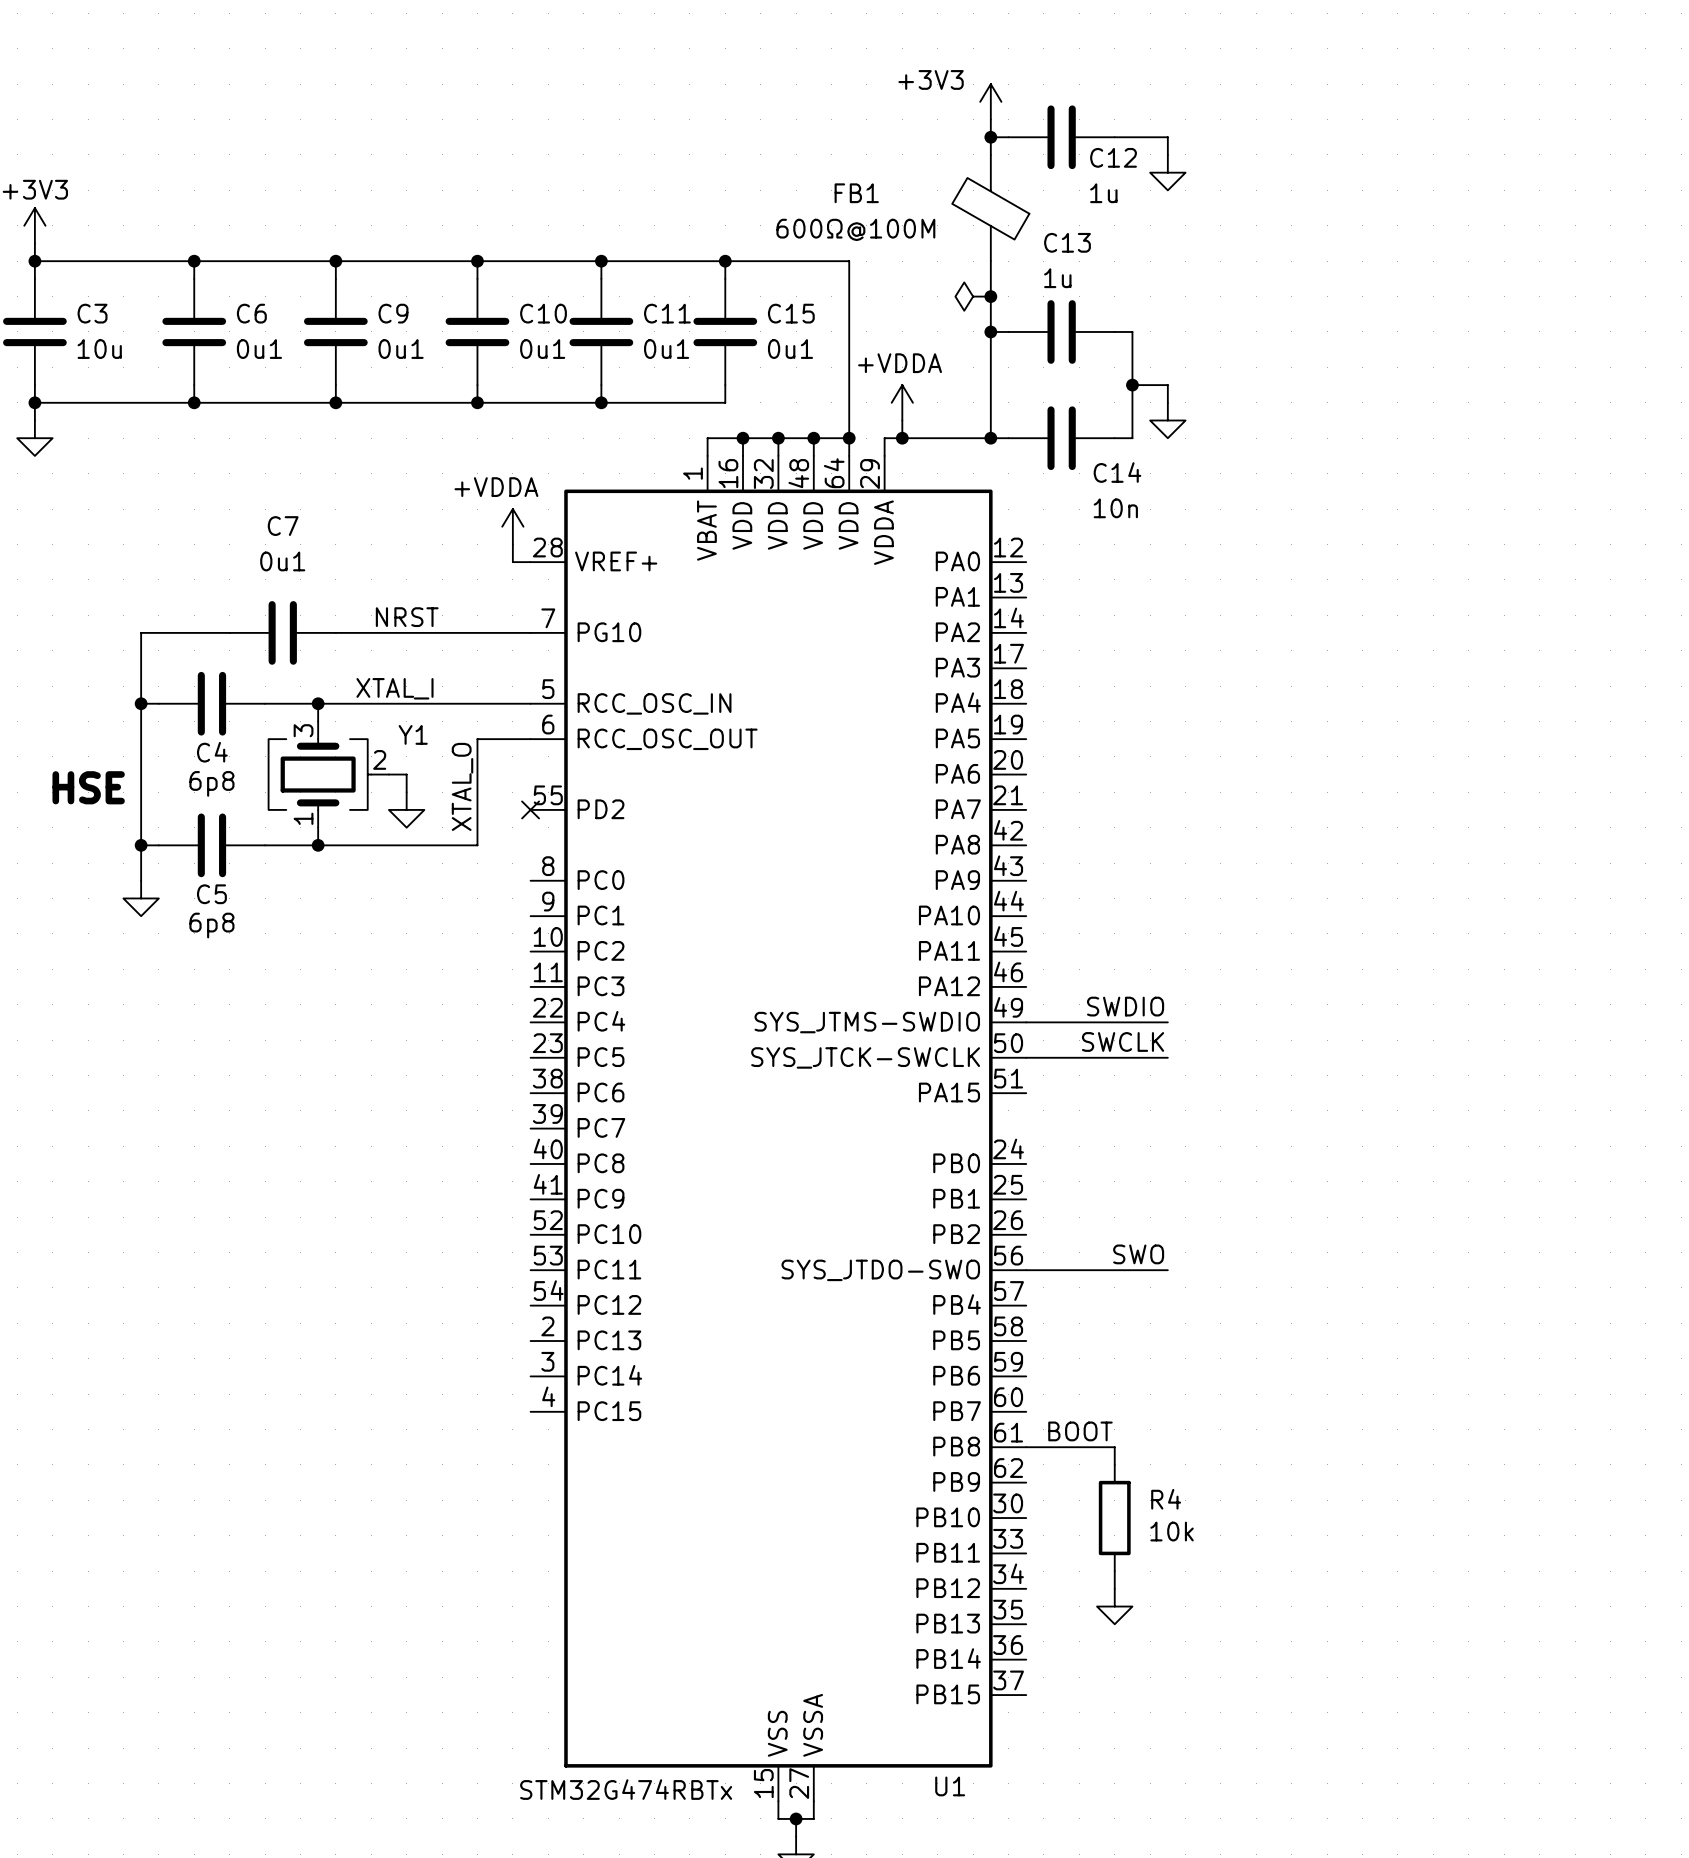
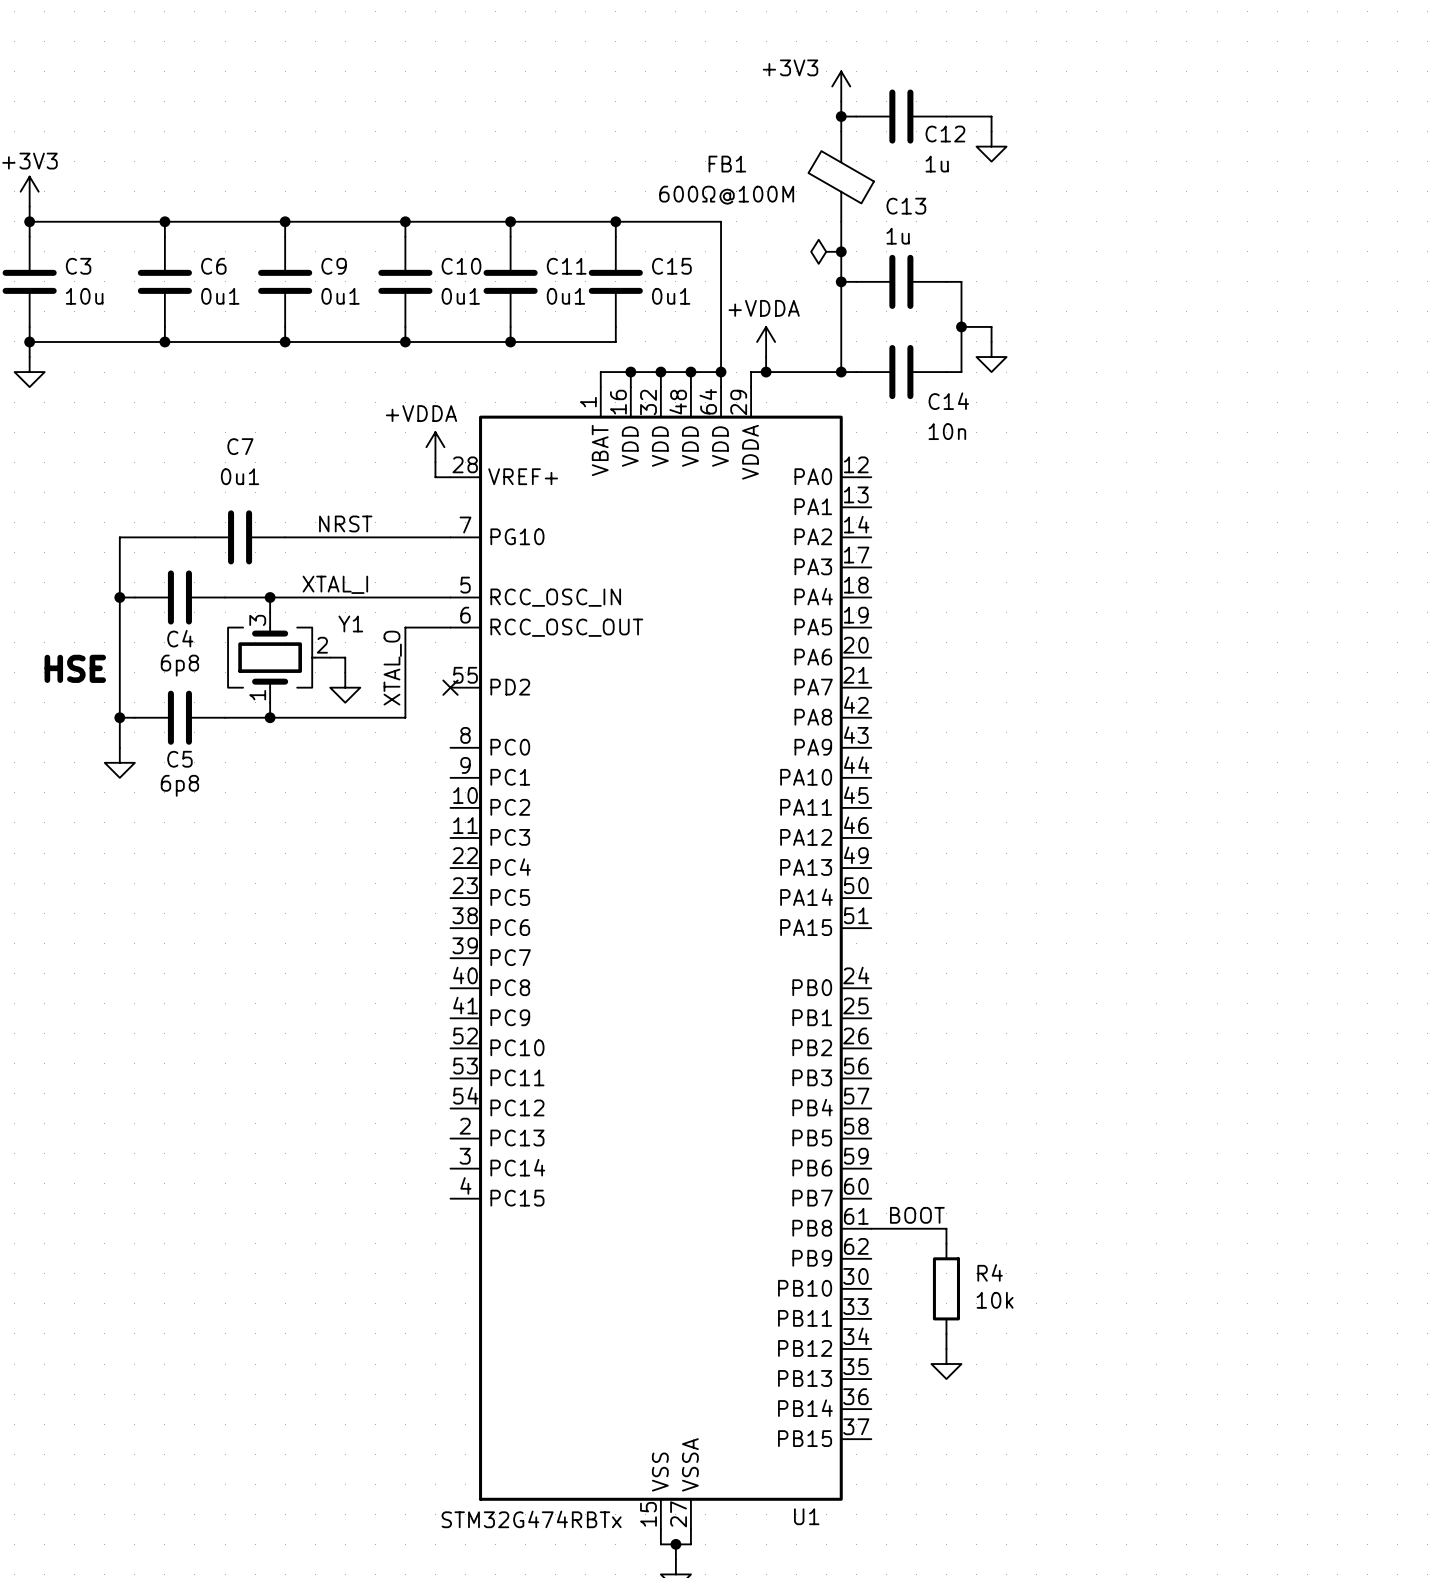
label: SWDIO (1125, 1006) -> none
U1 pin name: SYS_JTMS-SWDIO (867, 1022) -> PA13 (806, 867)
wire: (1026, 1022) (1167, 1022) -> none
label: SWCLK (1123, 1041) -> none
U1 pin name: SYS_JTCK-SWCLK (865, 1057) -> PA14 (806, 897)
wire: (1026, 1057) (1167, 1057) -> none
label: SWO (1138, 1254) -> none
U1 pin name: SYS_JTDO-SWO (880, 1270) -> PB3 (812, 1077)
wire: (1026, 1270) (1167, 1270) -> none

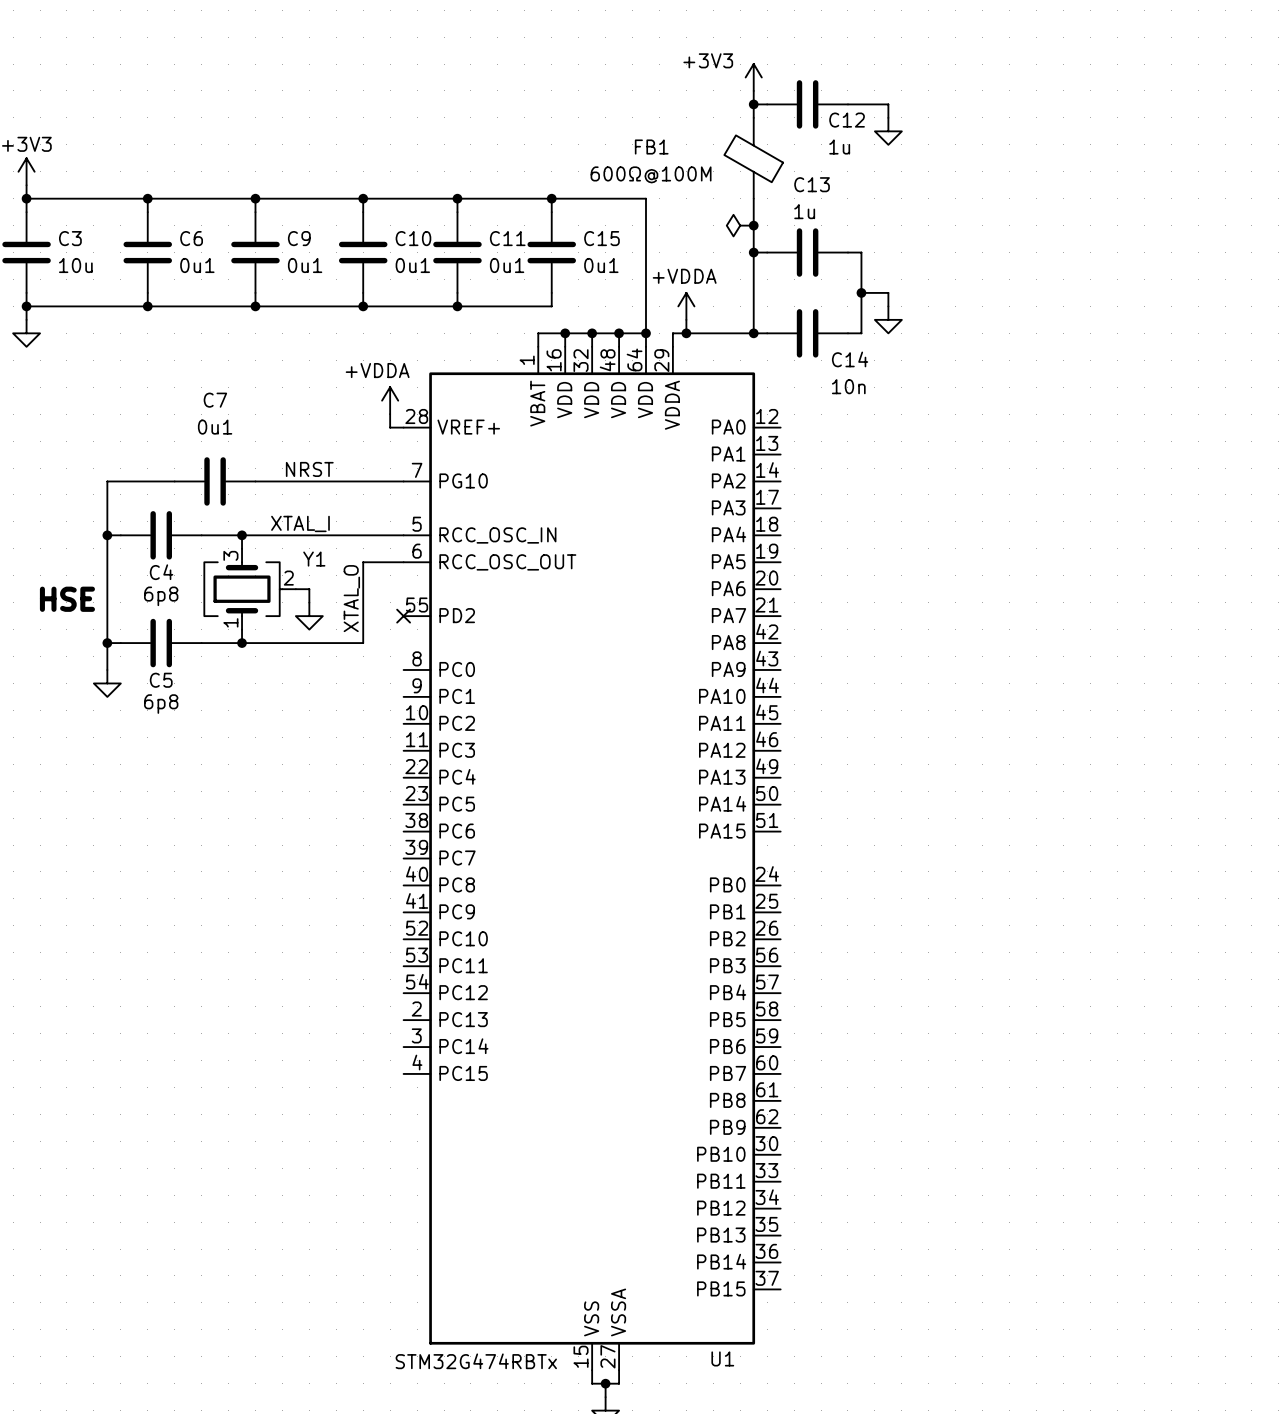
label: BOOT (917, 1215) -> none
wire: (871, 1228) (946, 1228) (946, 1243) -> none
R4: 10k (946, 1288) -> none
wire: (946, 1333) (946, 1348) -> none
power symbol: (946, 1364) -> none

